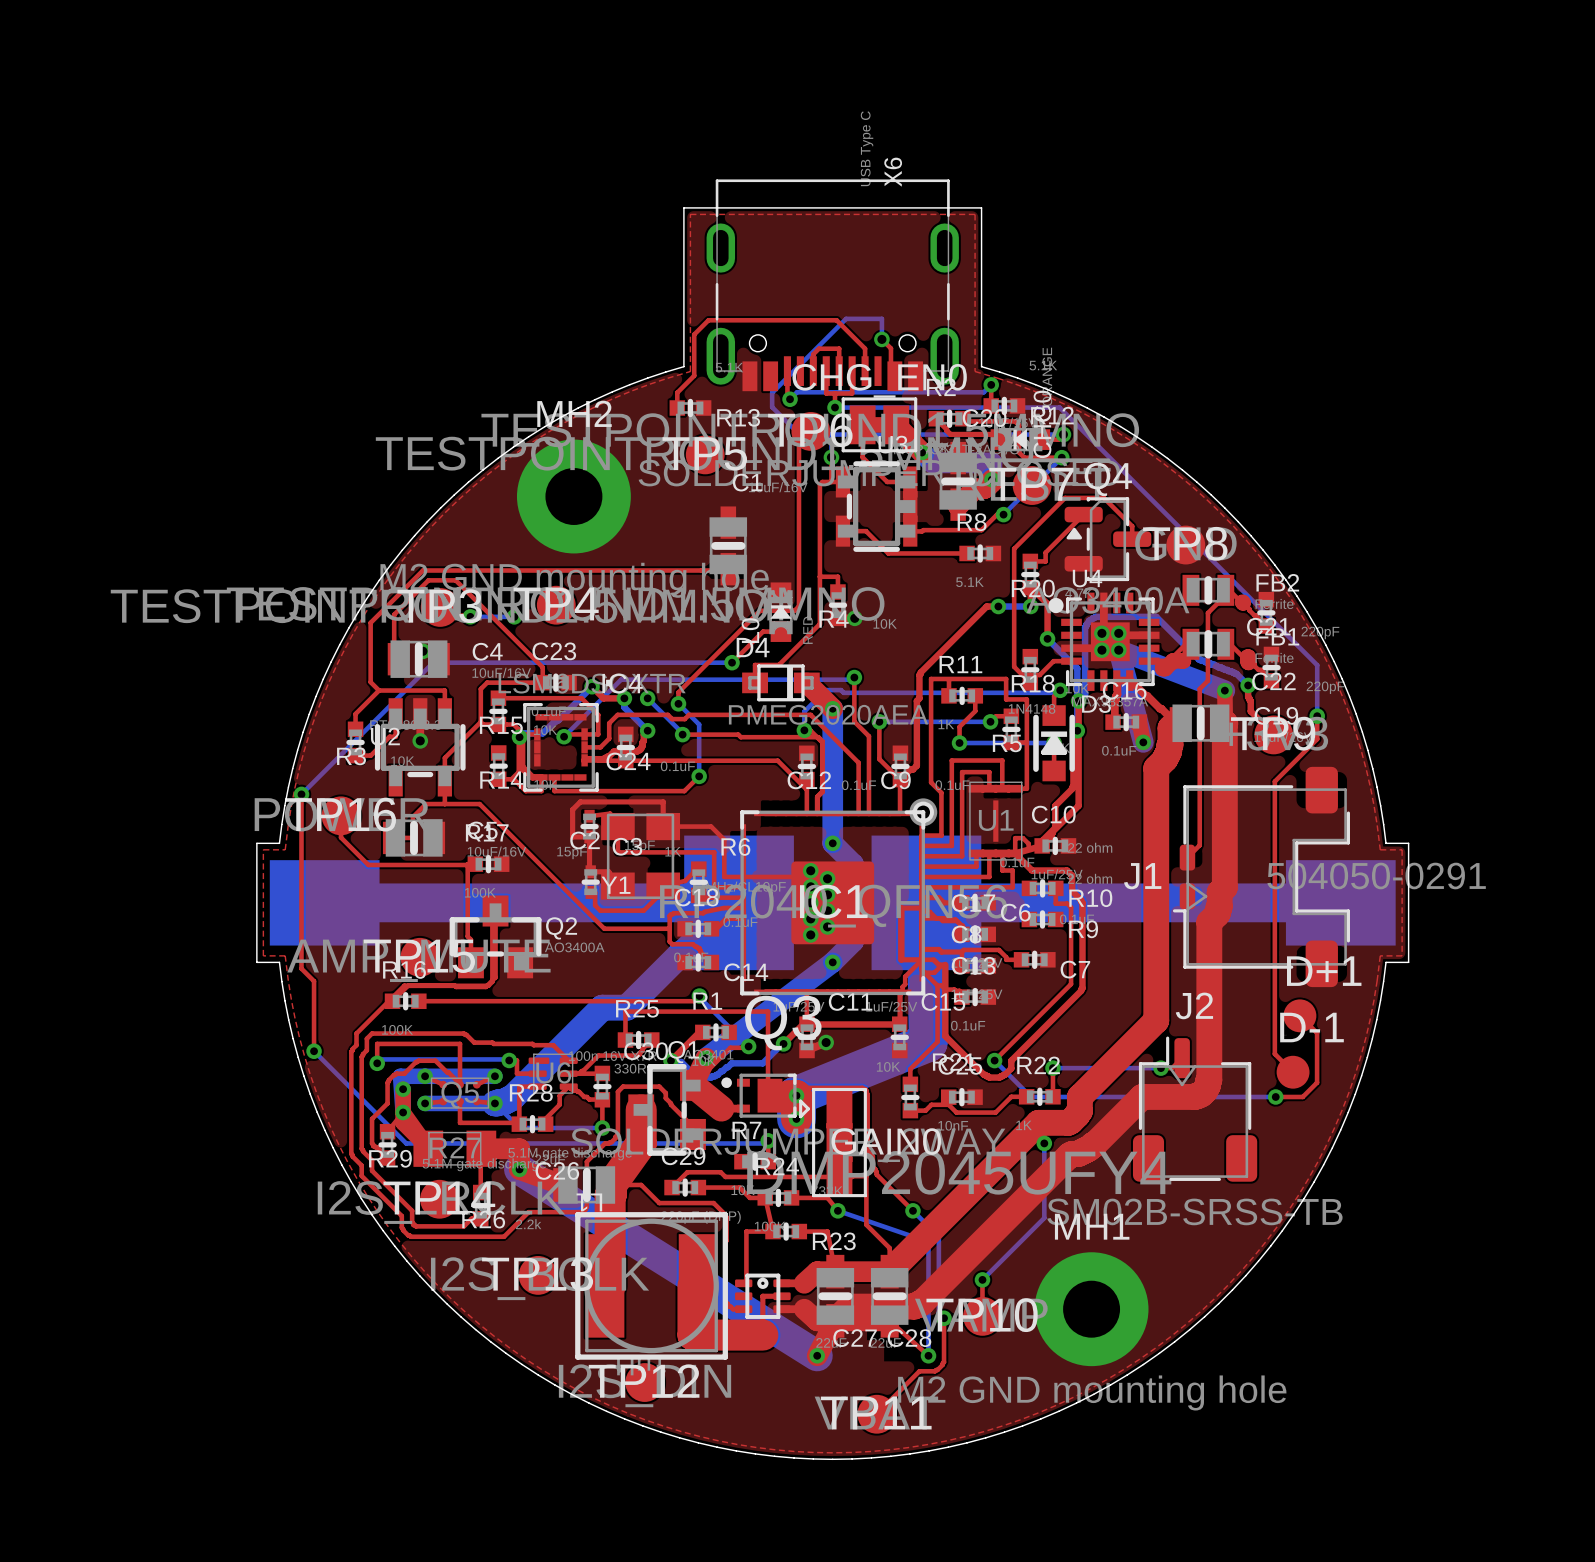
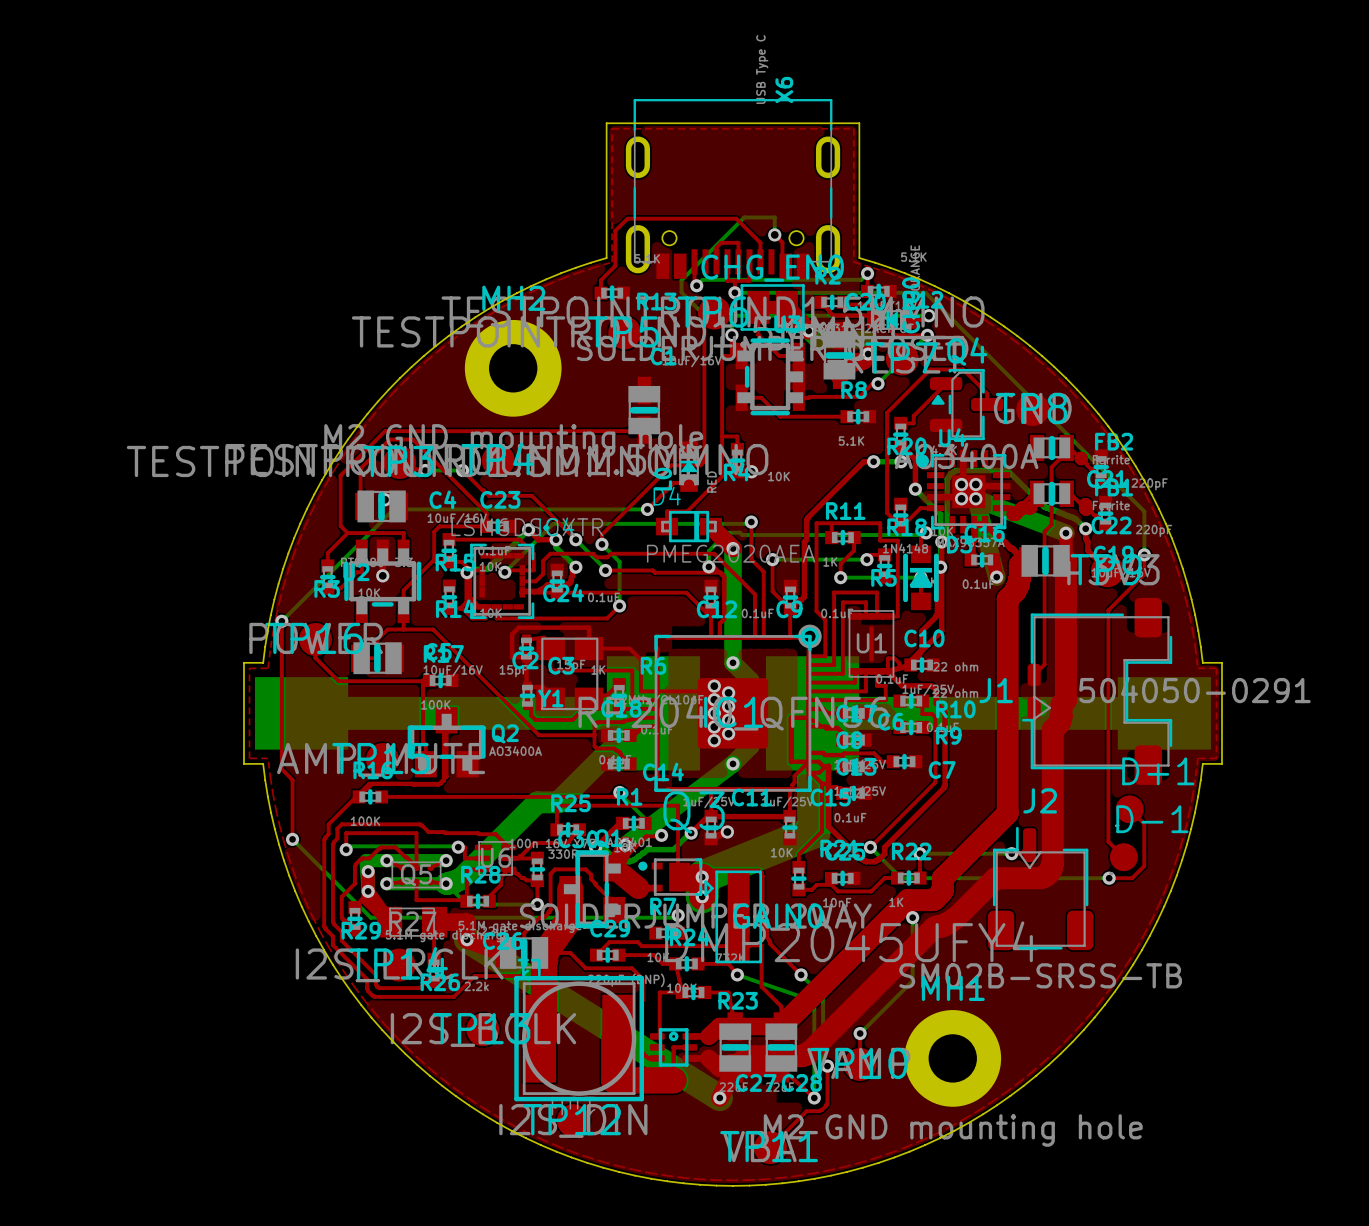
top track: none -> (462, 470) (489, 495) (531, 495) (575, 539)

